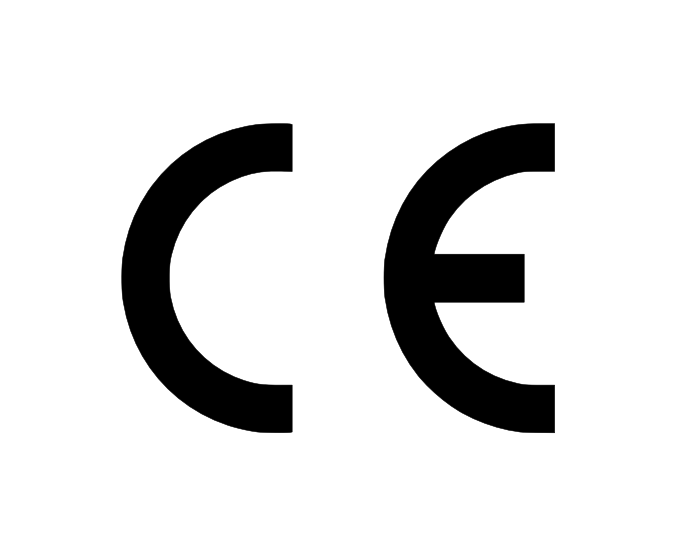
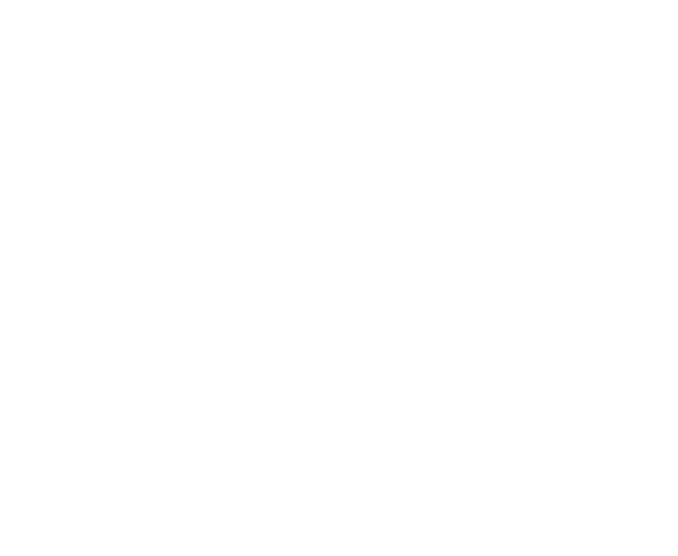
drawing: [121, 123, 555, 434] -> none

